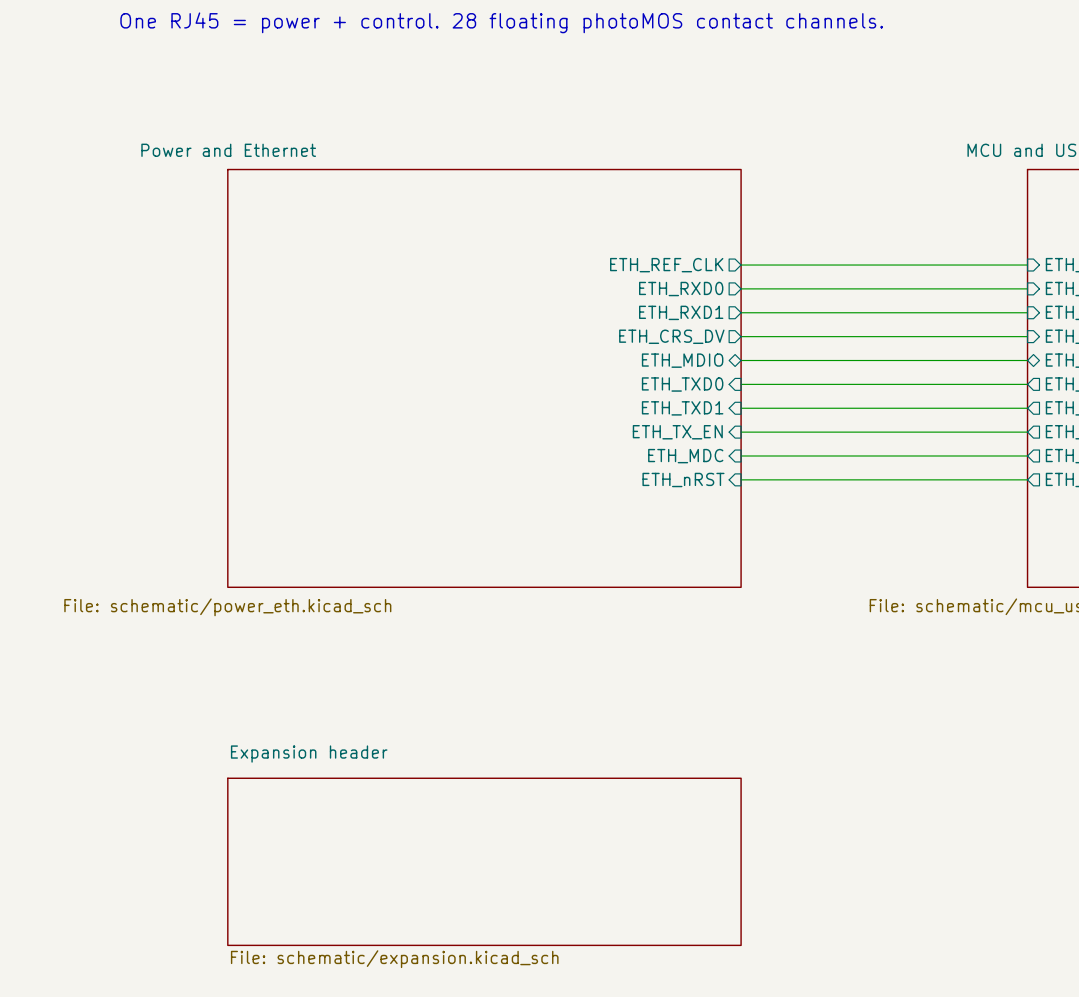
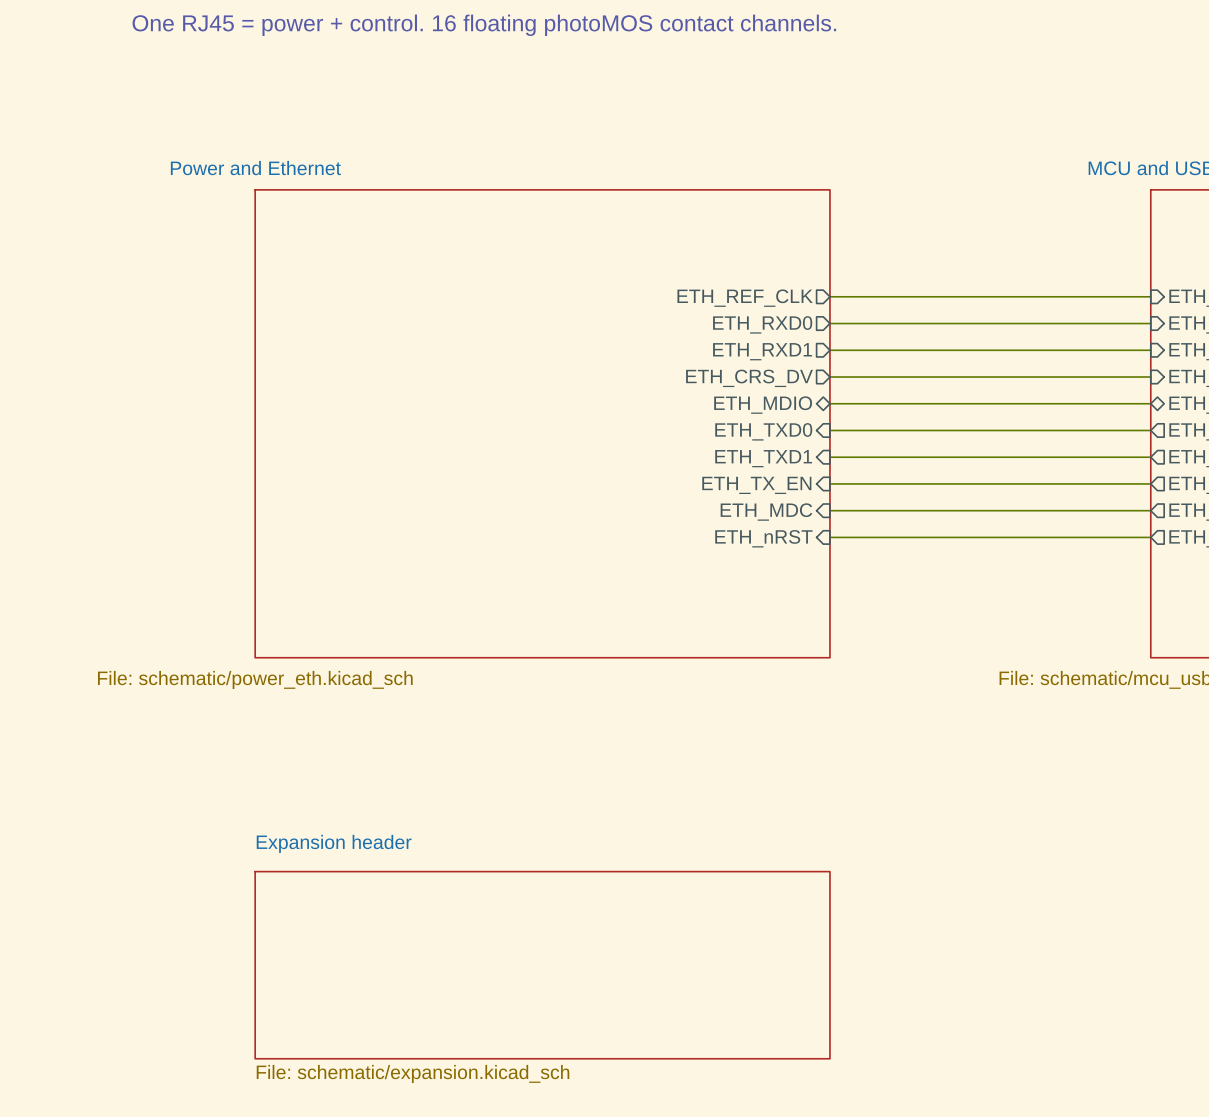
text: One RJ45 = power + control. 28 floating photoMOS contact channels. (501, 22) -> One RJ45 = power + control. 16 floating photoMOS contact channels. (484, 25)

